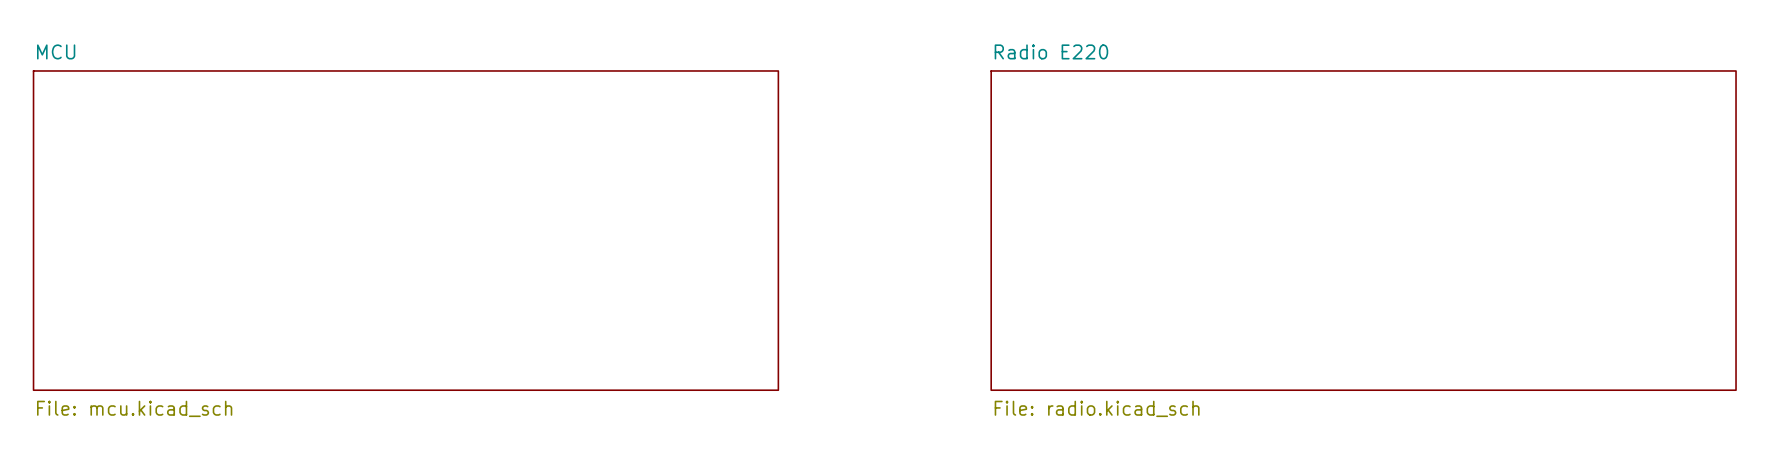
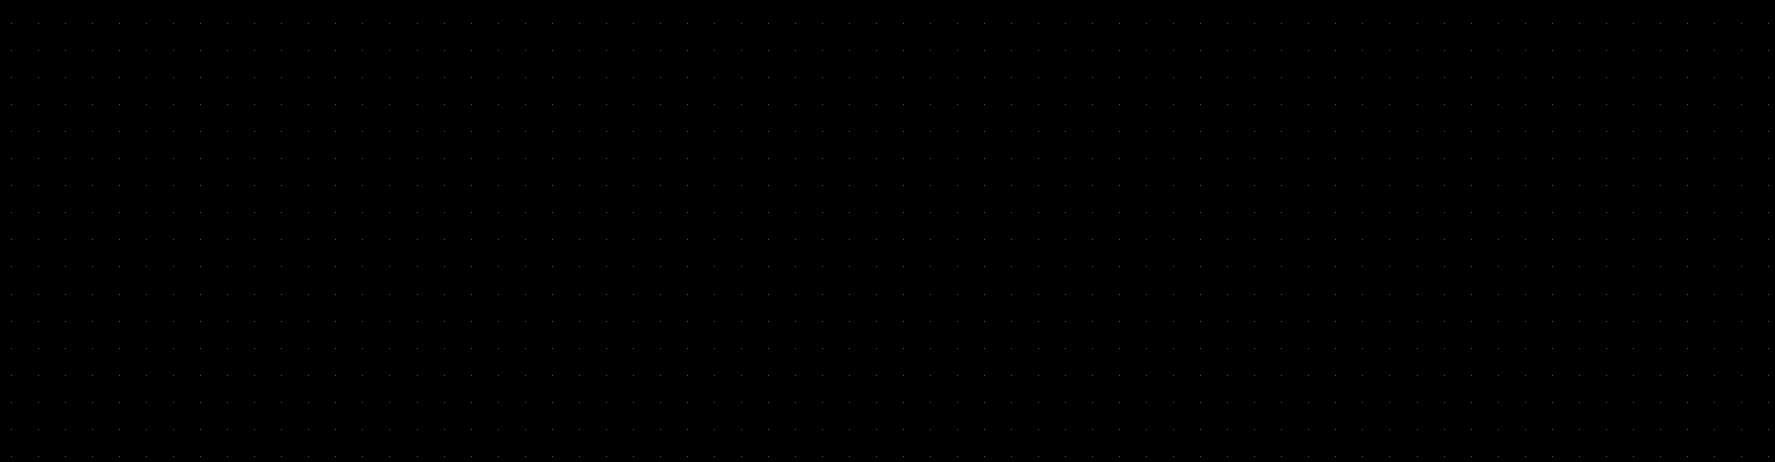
sheet MCU: File: mcu.kicad_sch (405, 230) -> none
sheet Radio E220: File: radio.kicad_sch (1363, 230) -> none

